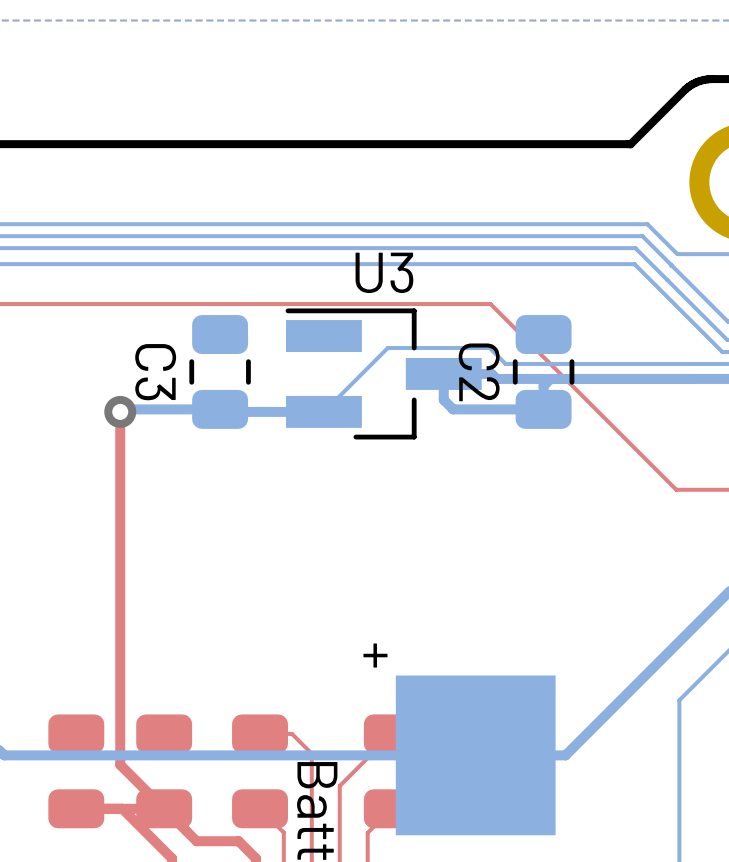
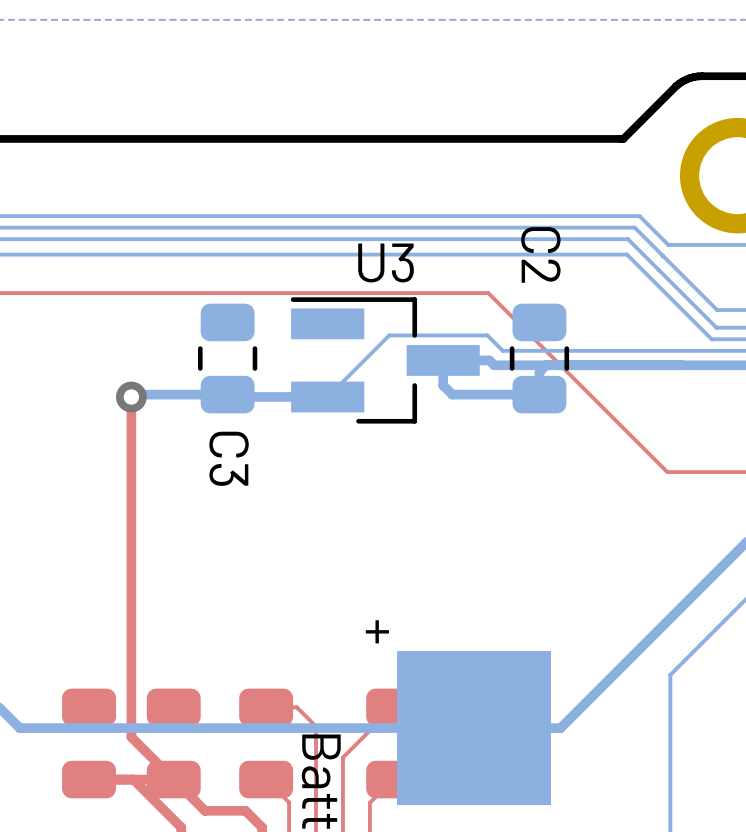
C3 name position: C3 (155, 372) -> C3 (229, 458)
C2 name position: C2 (479, 372) -> C2 (540, 254)

